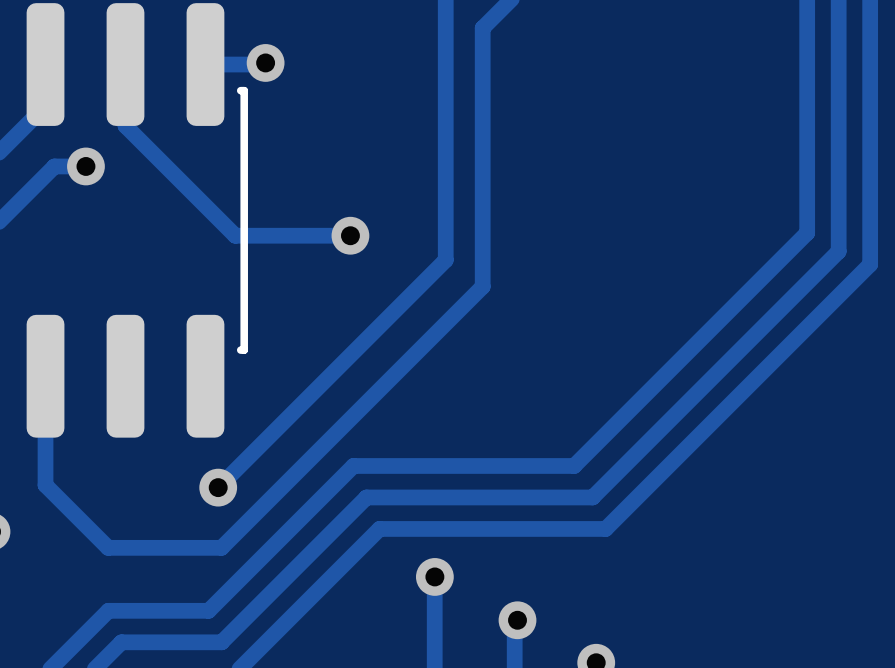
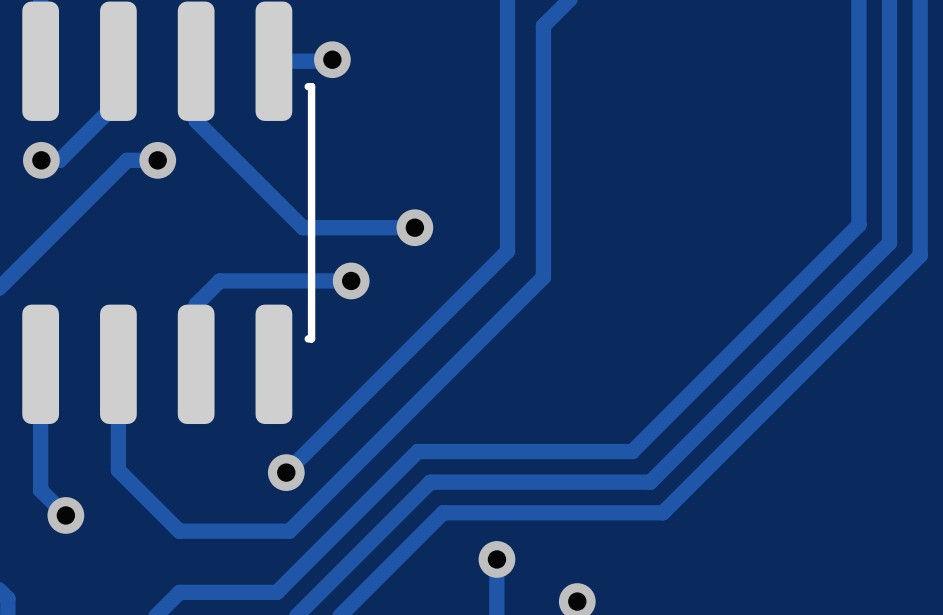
track: none -> (351, 280) (219, 280) (196, 304) (196, 364)
via: none -> (351, 280)

